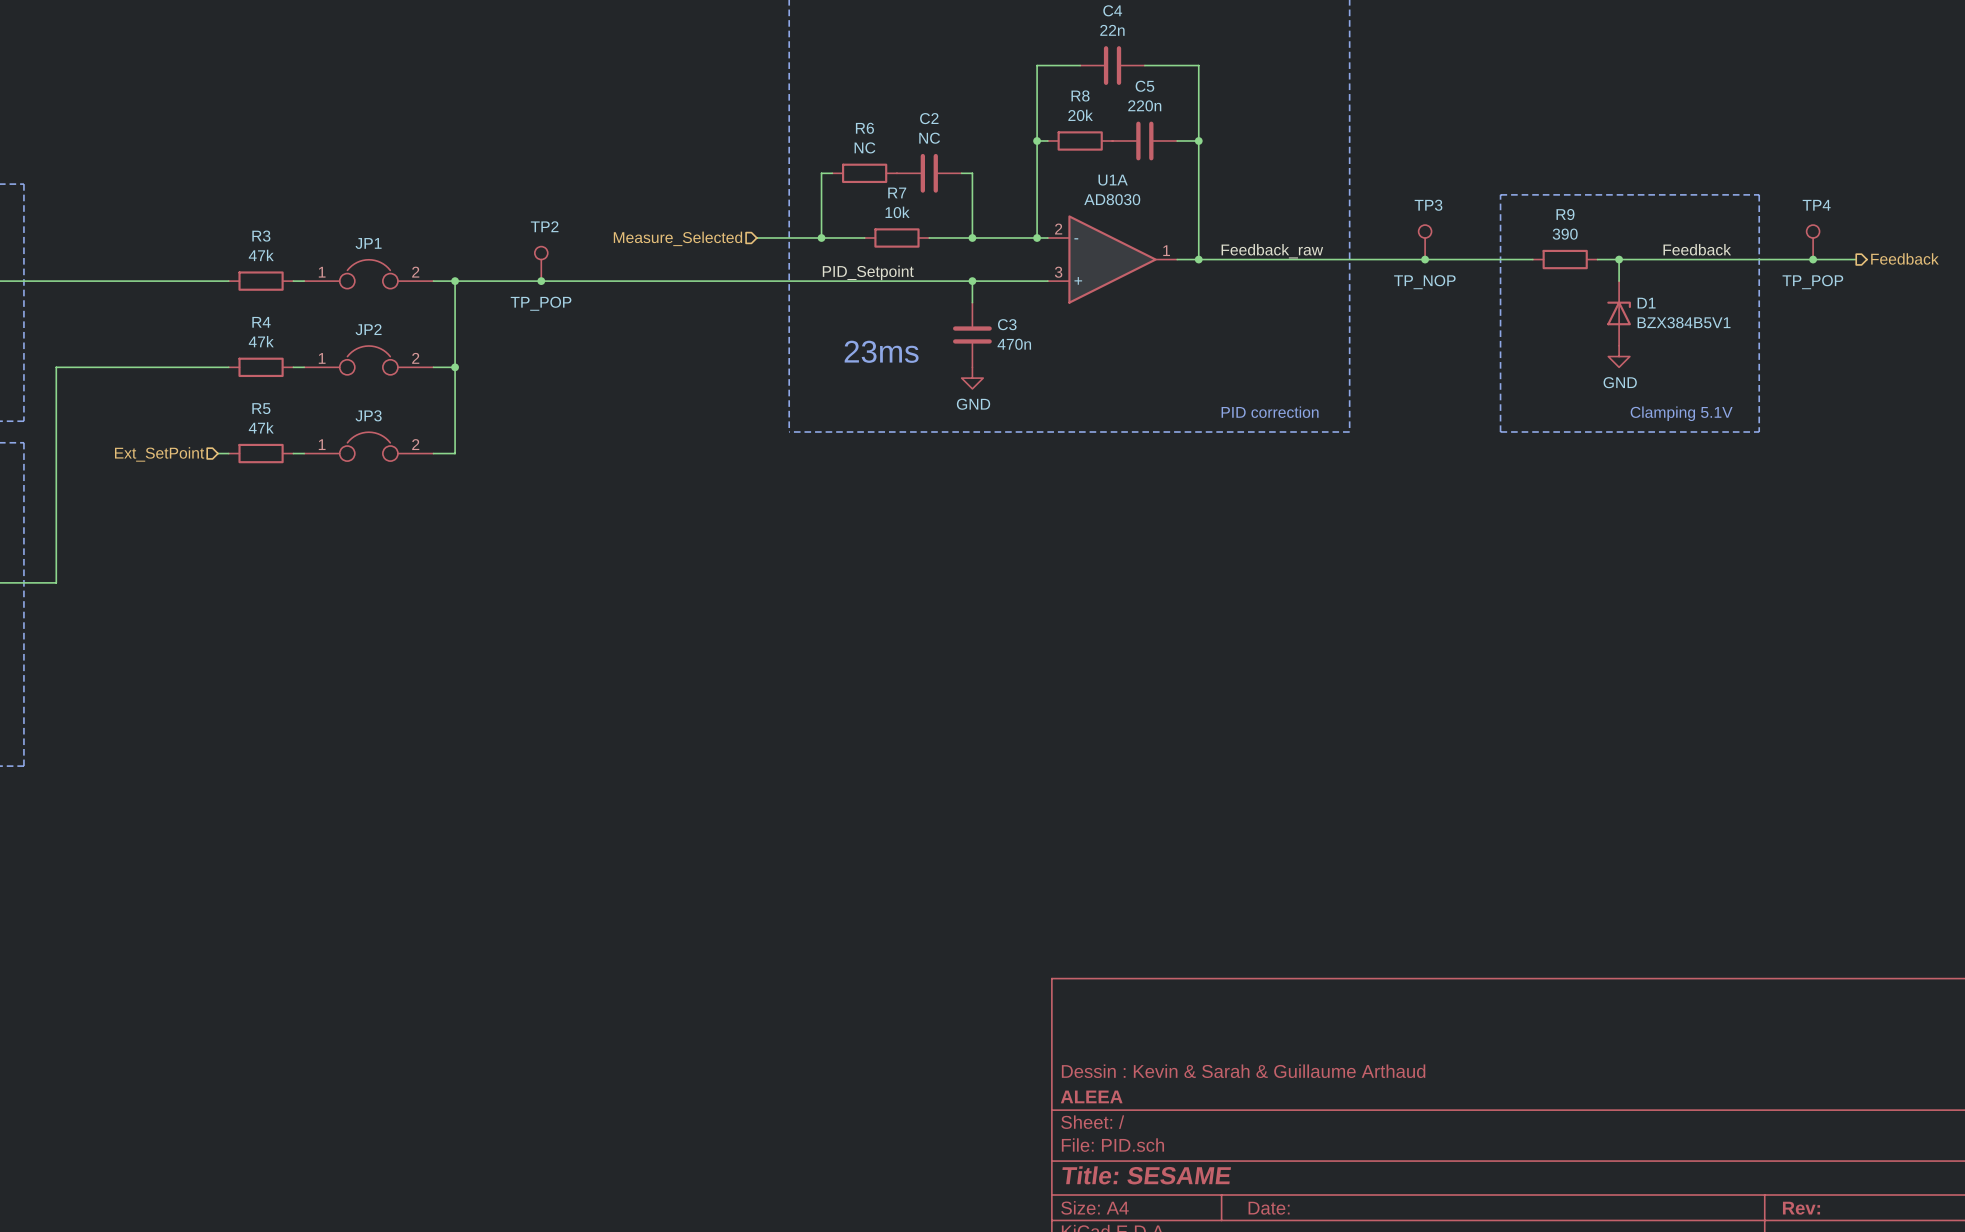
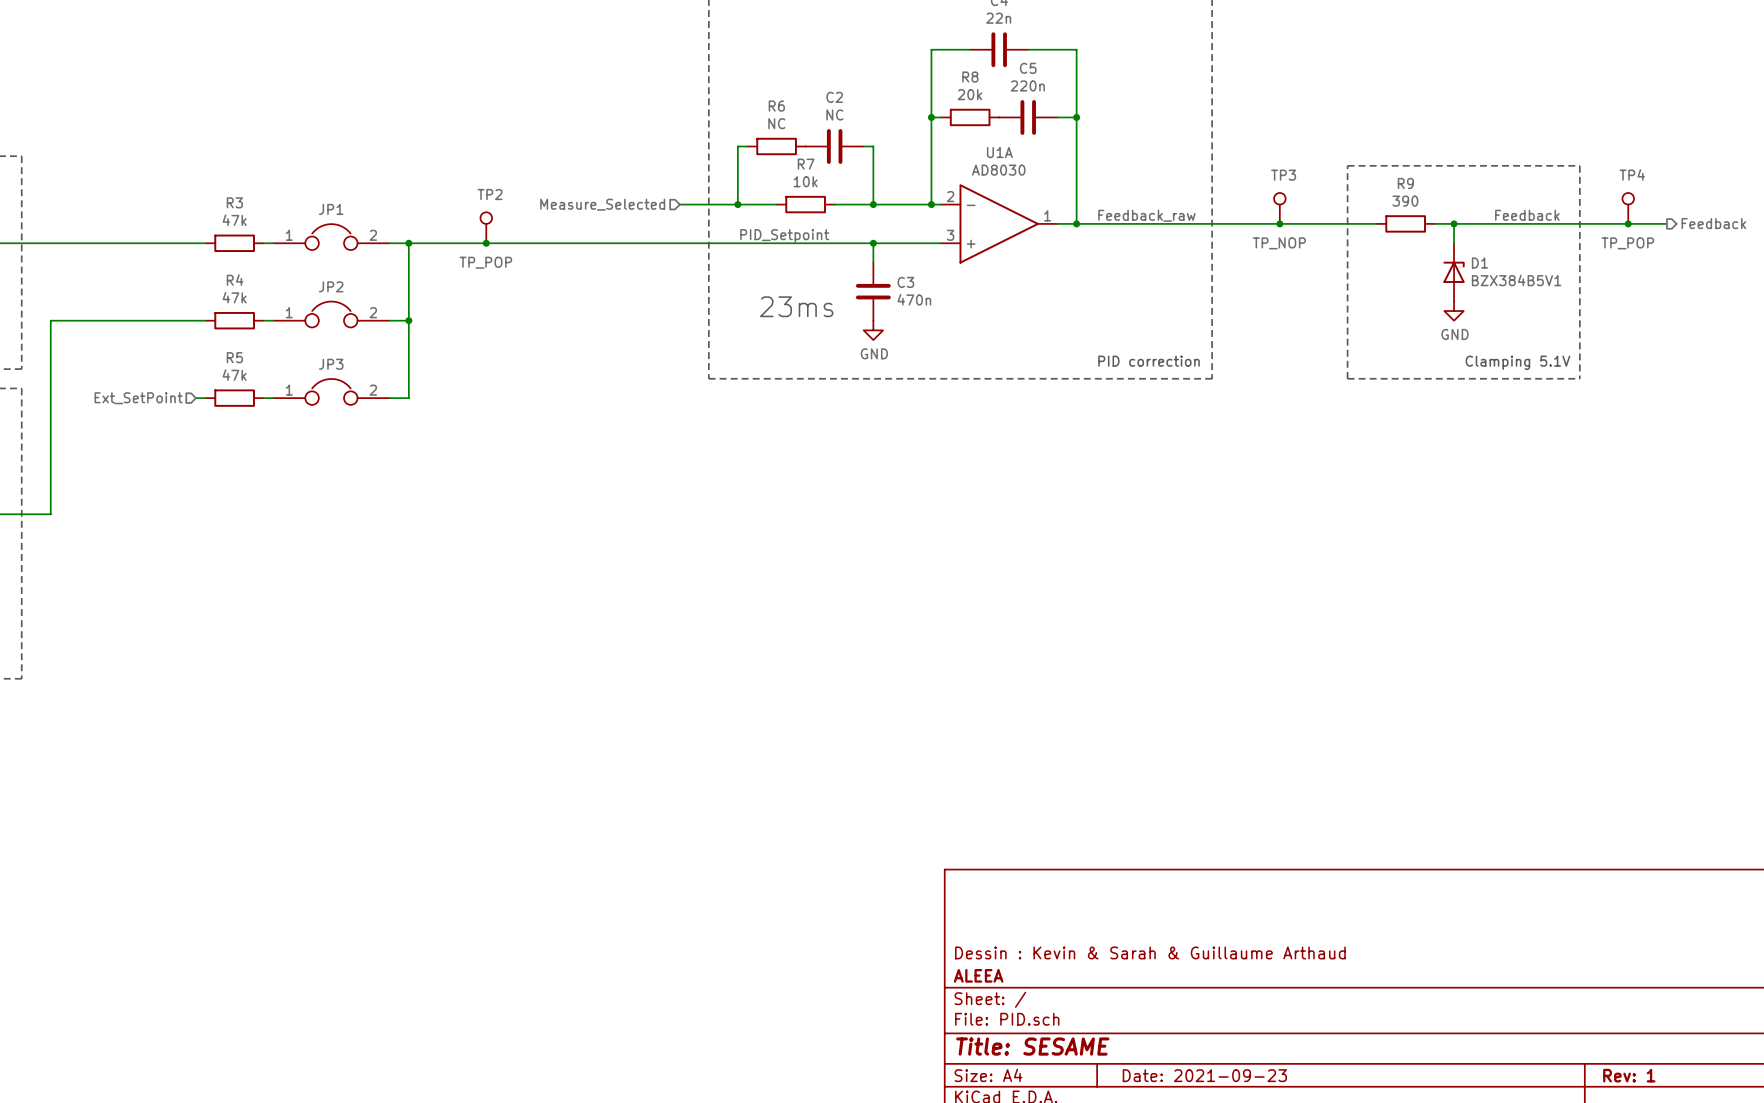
title block: Date: (1269, 1208) -> Date: 2021-09-23 (1204, 1075)
title block: Rev: (1801, 1208) -> Rev: 1 (1629, 1075)

